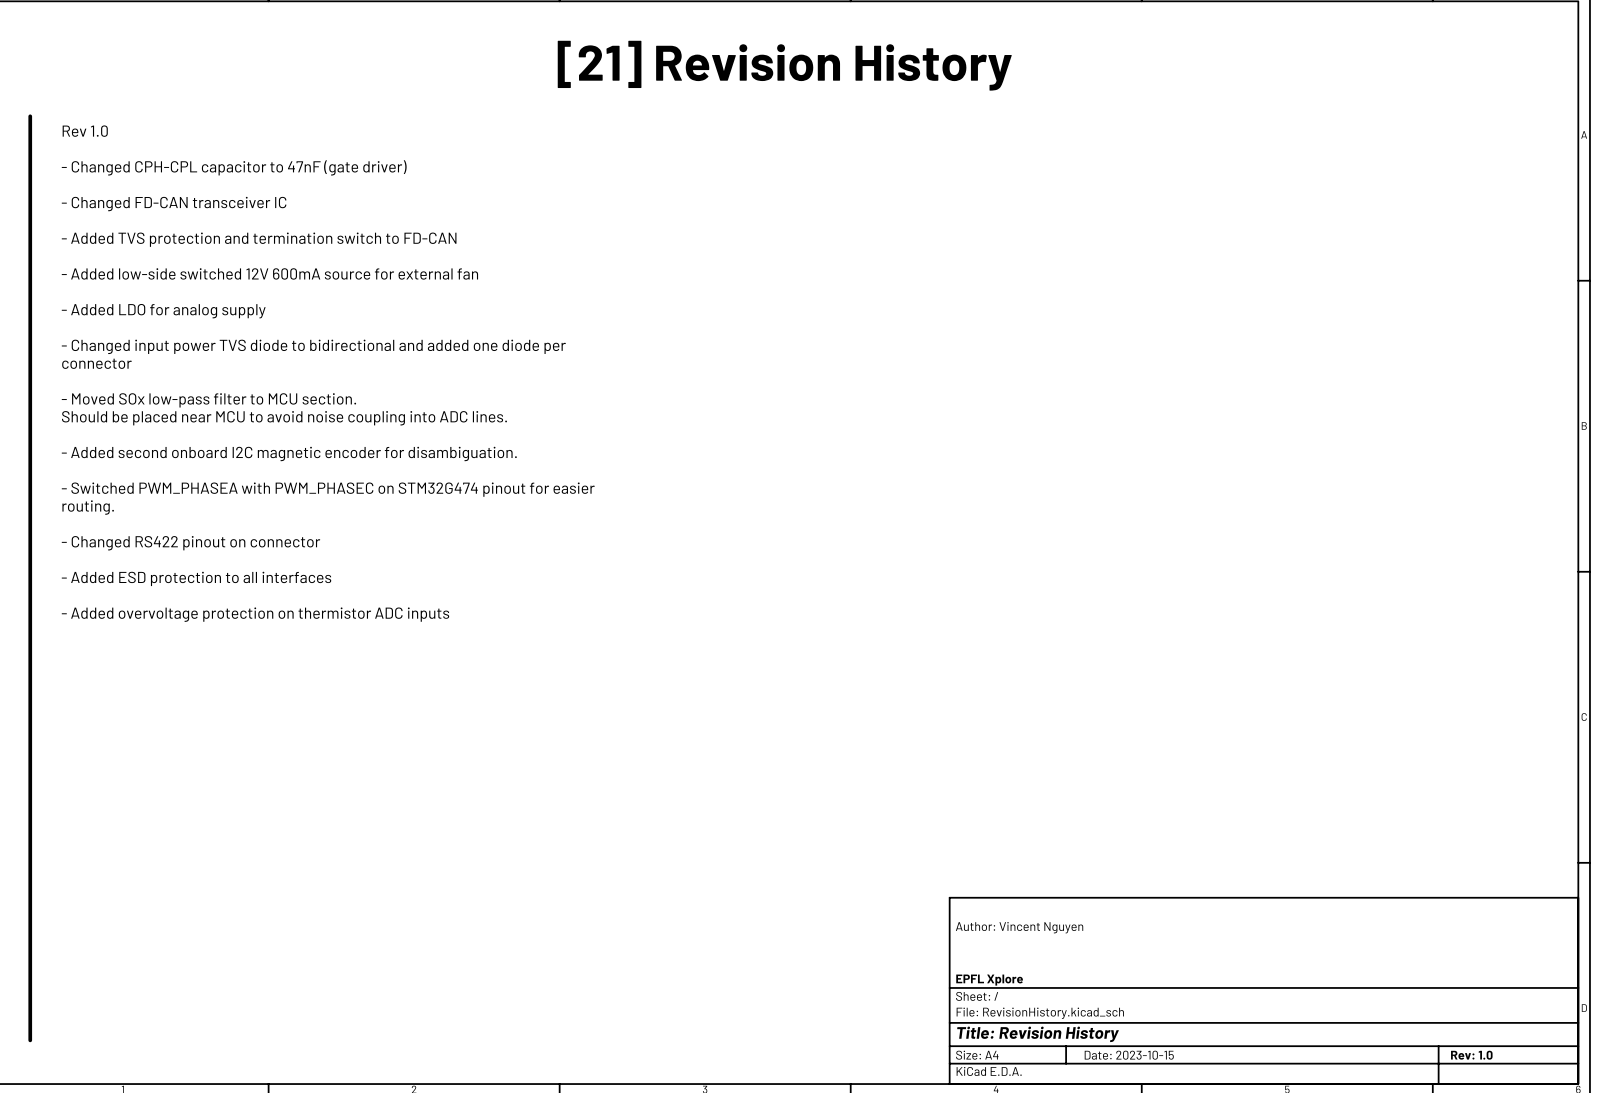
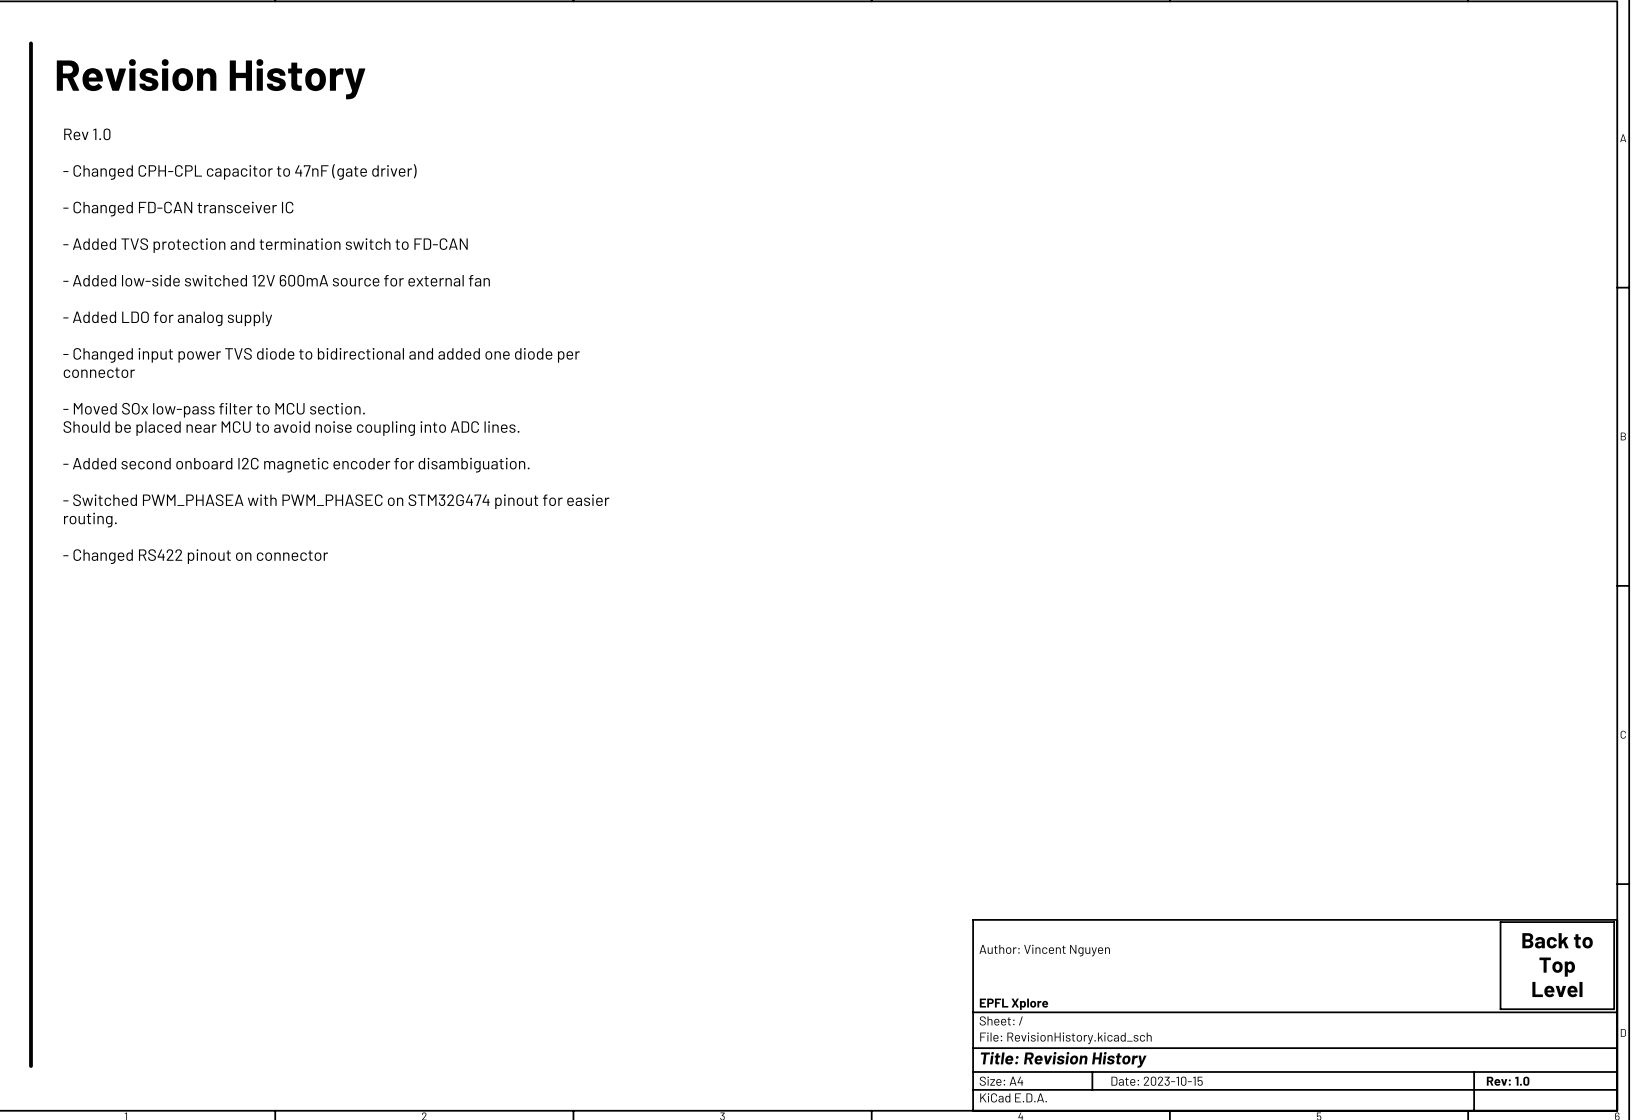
line: none -> (30, 43) (30, 119)
text: [21] Revision History (784, 65) -> none
text: none -> Revision History (211, 79)
text: - Added ESD protection to all interfaces (196, 578) -> none
text: - Added overvoltage protection on thermistor ADC inputs (255, 614) -> none
line: none -> (1500, 922) (1614, 922) (1614, 1009) (1500, 1009) (1500, 922)
text: none -> Back to (1557, 940)
text: none -> Top (1557, 967)
text: none -> Level (1557, 989)

